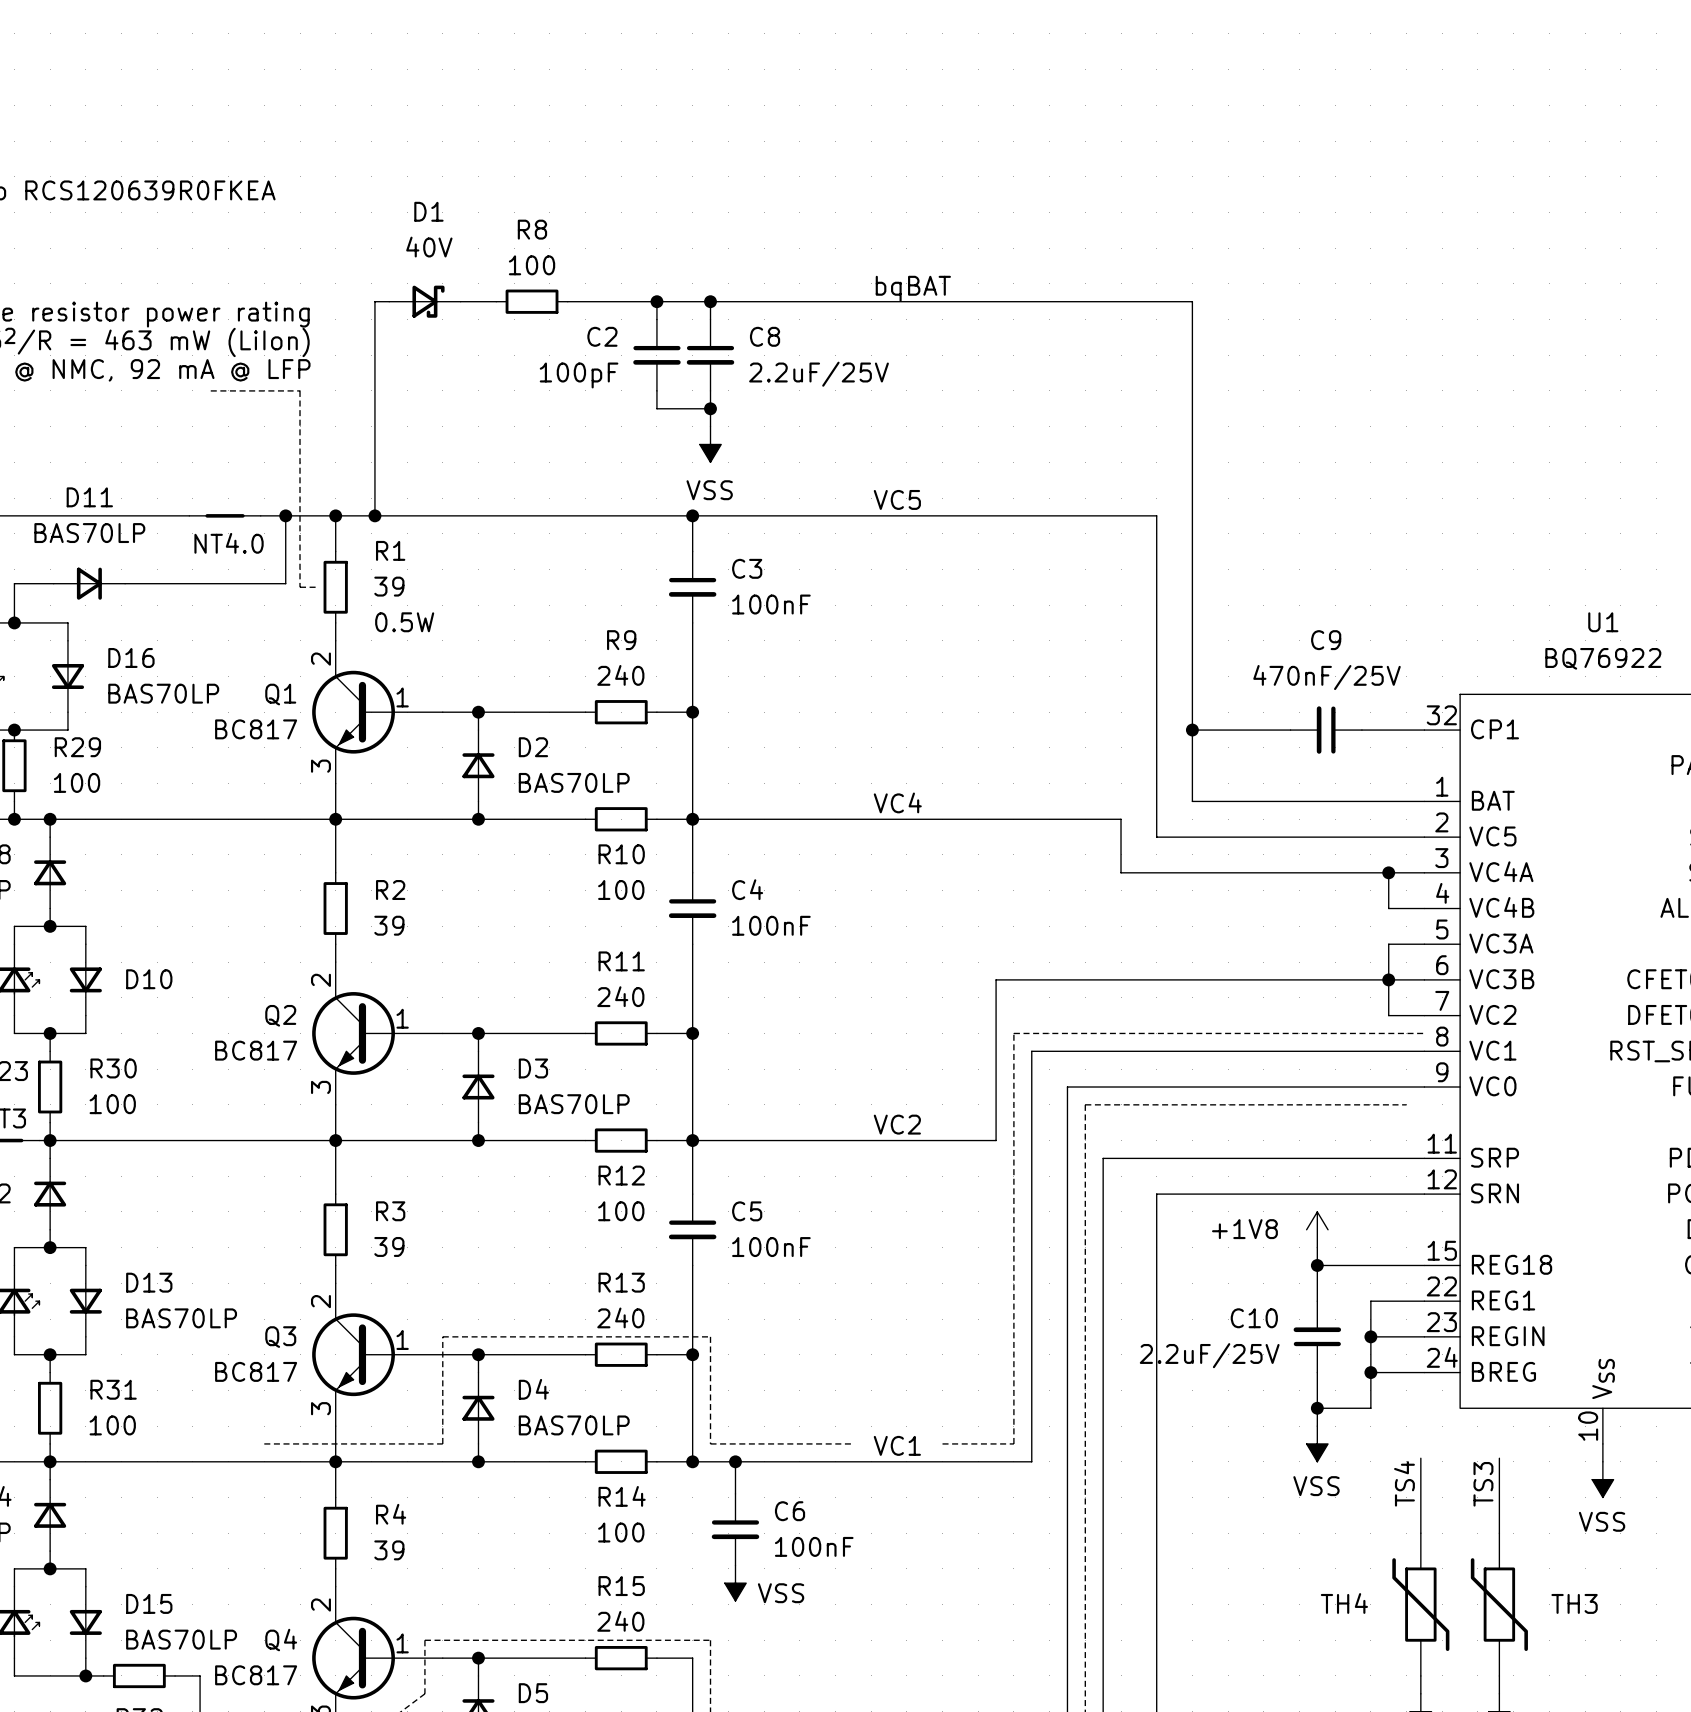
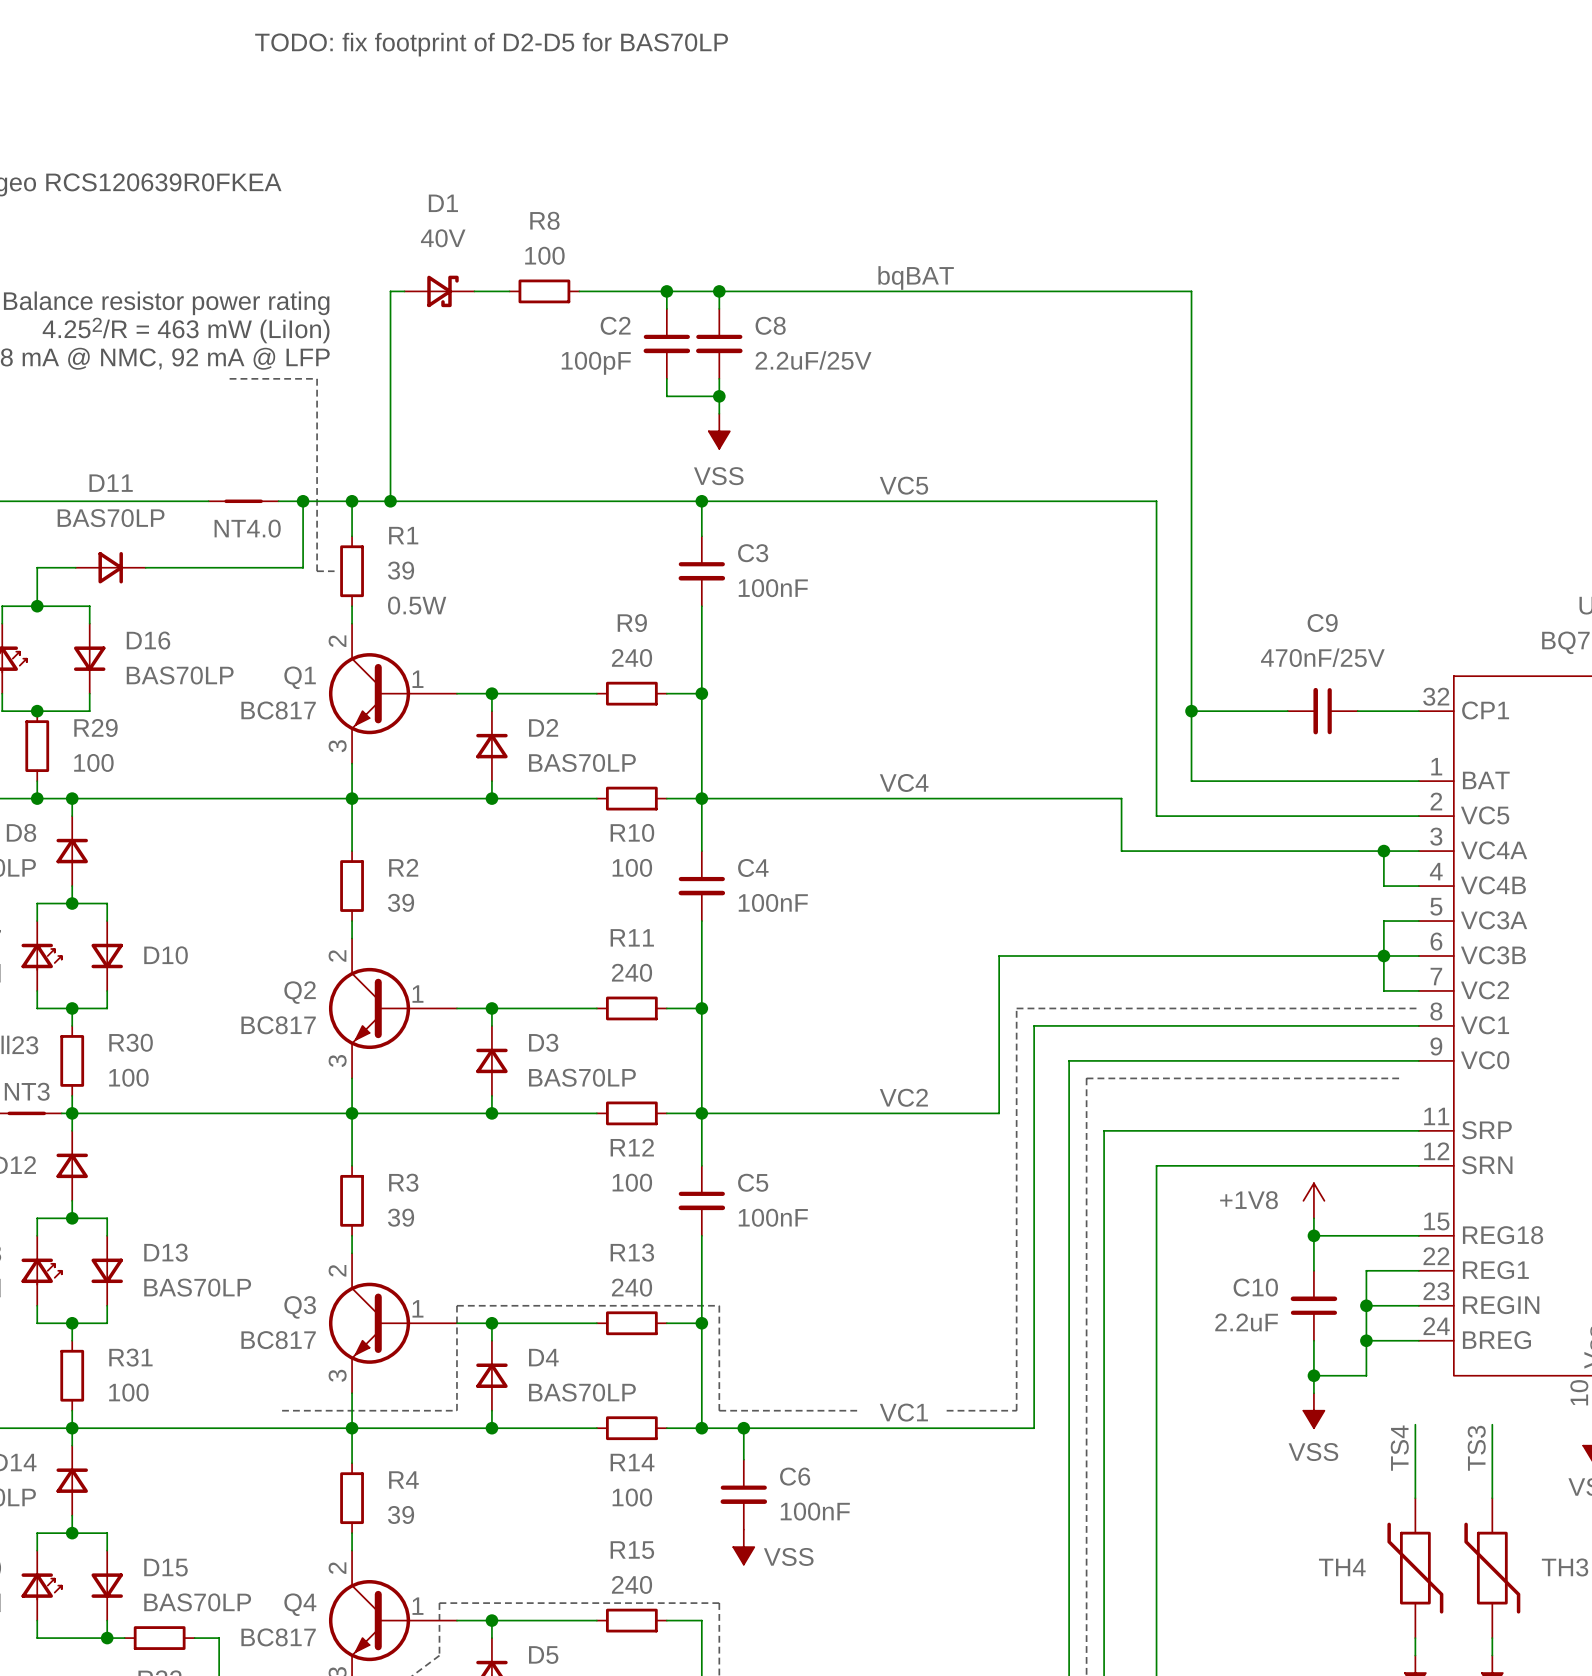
text: none -> TODO: fix footprint of D2-D5 for BAS70LP (491, 44)
C10 value: 2.2uF/25V (1209, 1355) -> 2.2uF (1246, 1322)

